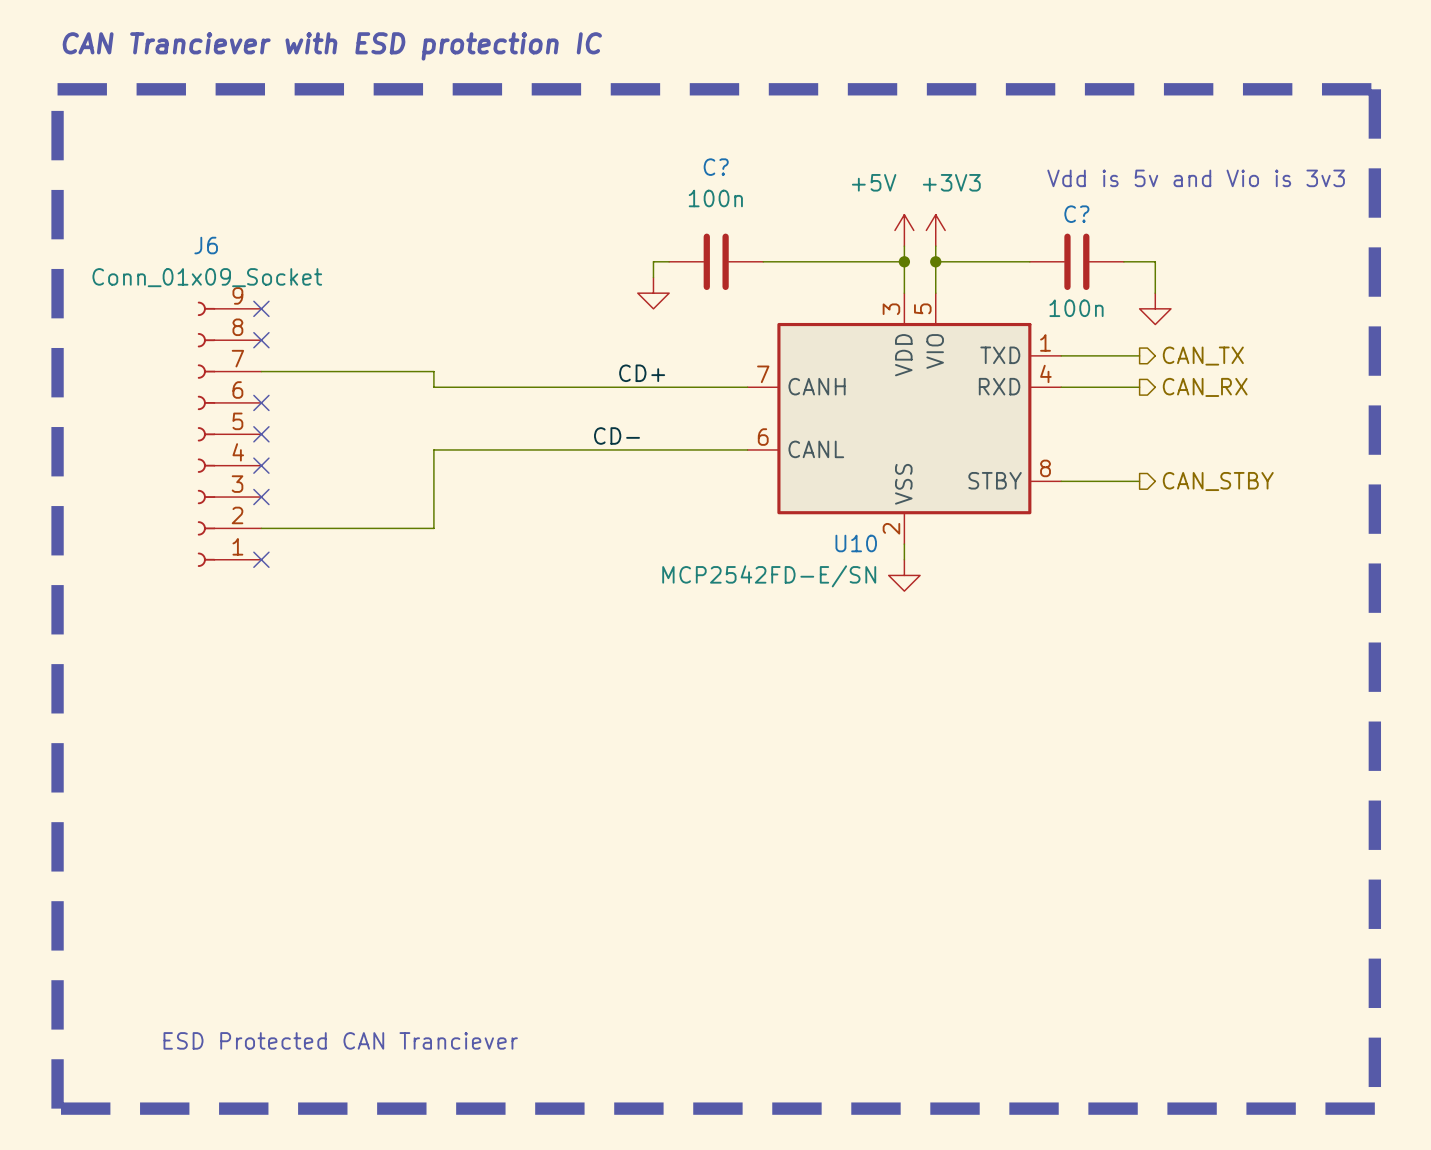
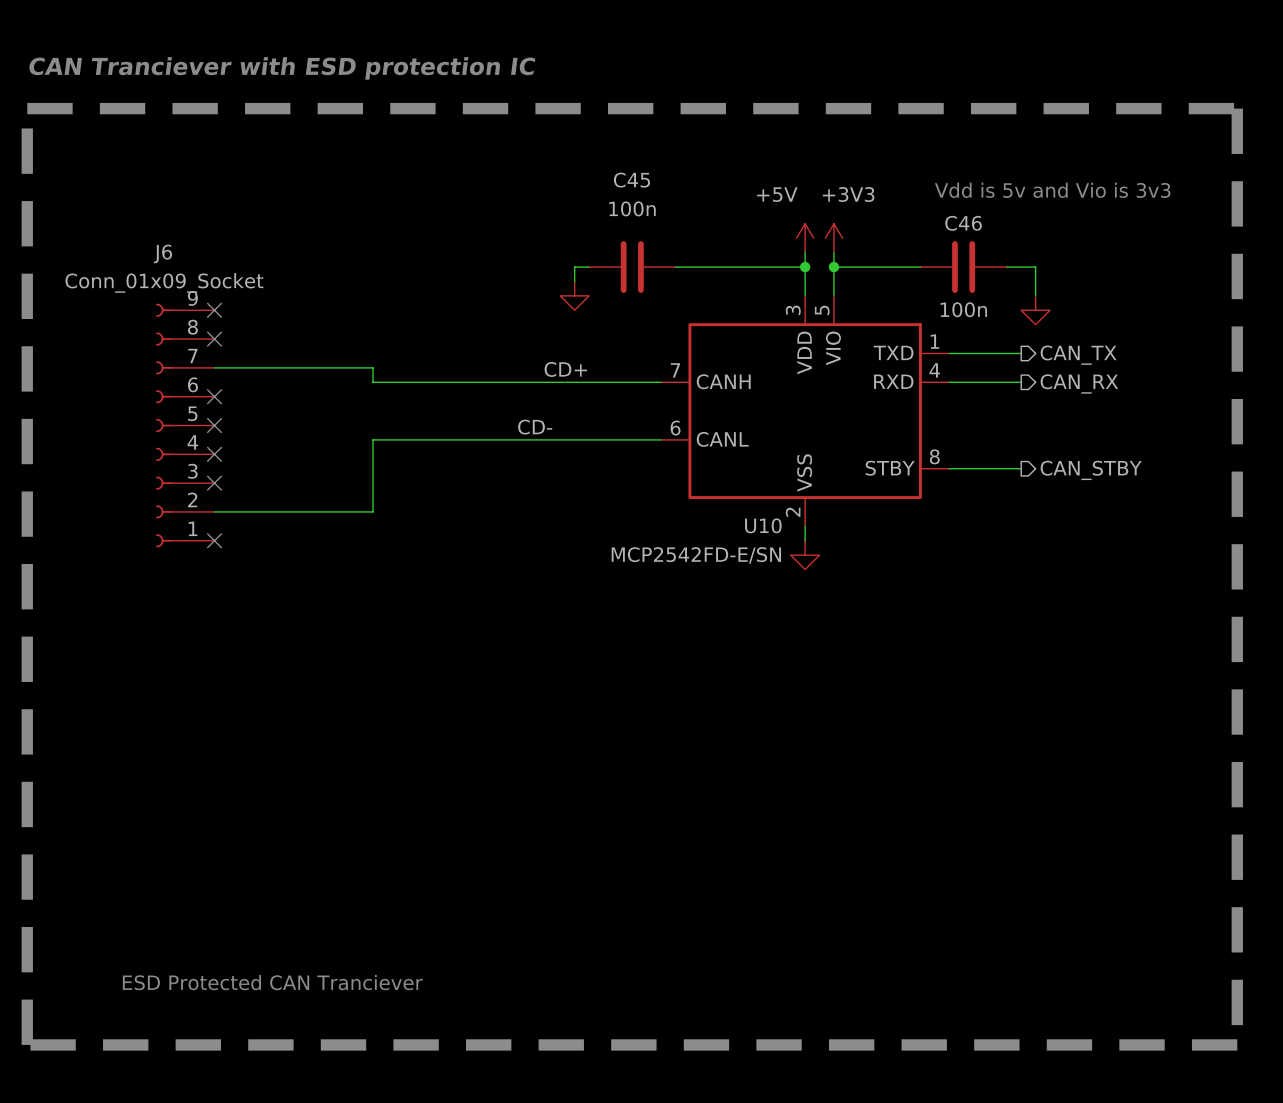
C? name: C? (716, 167) -> C45 (631, 180)
C? name: C? (1076, 214) -> C46 (963, 223)

